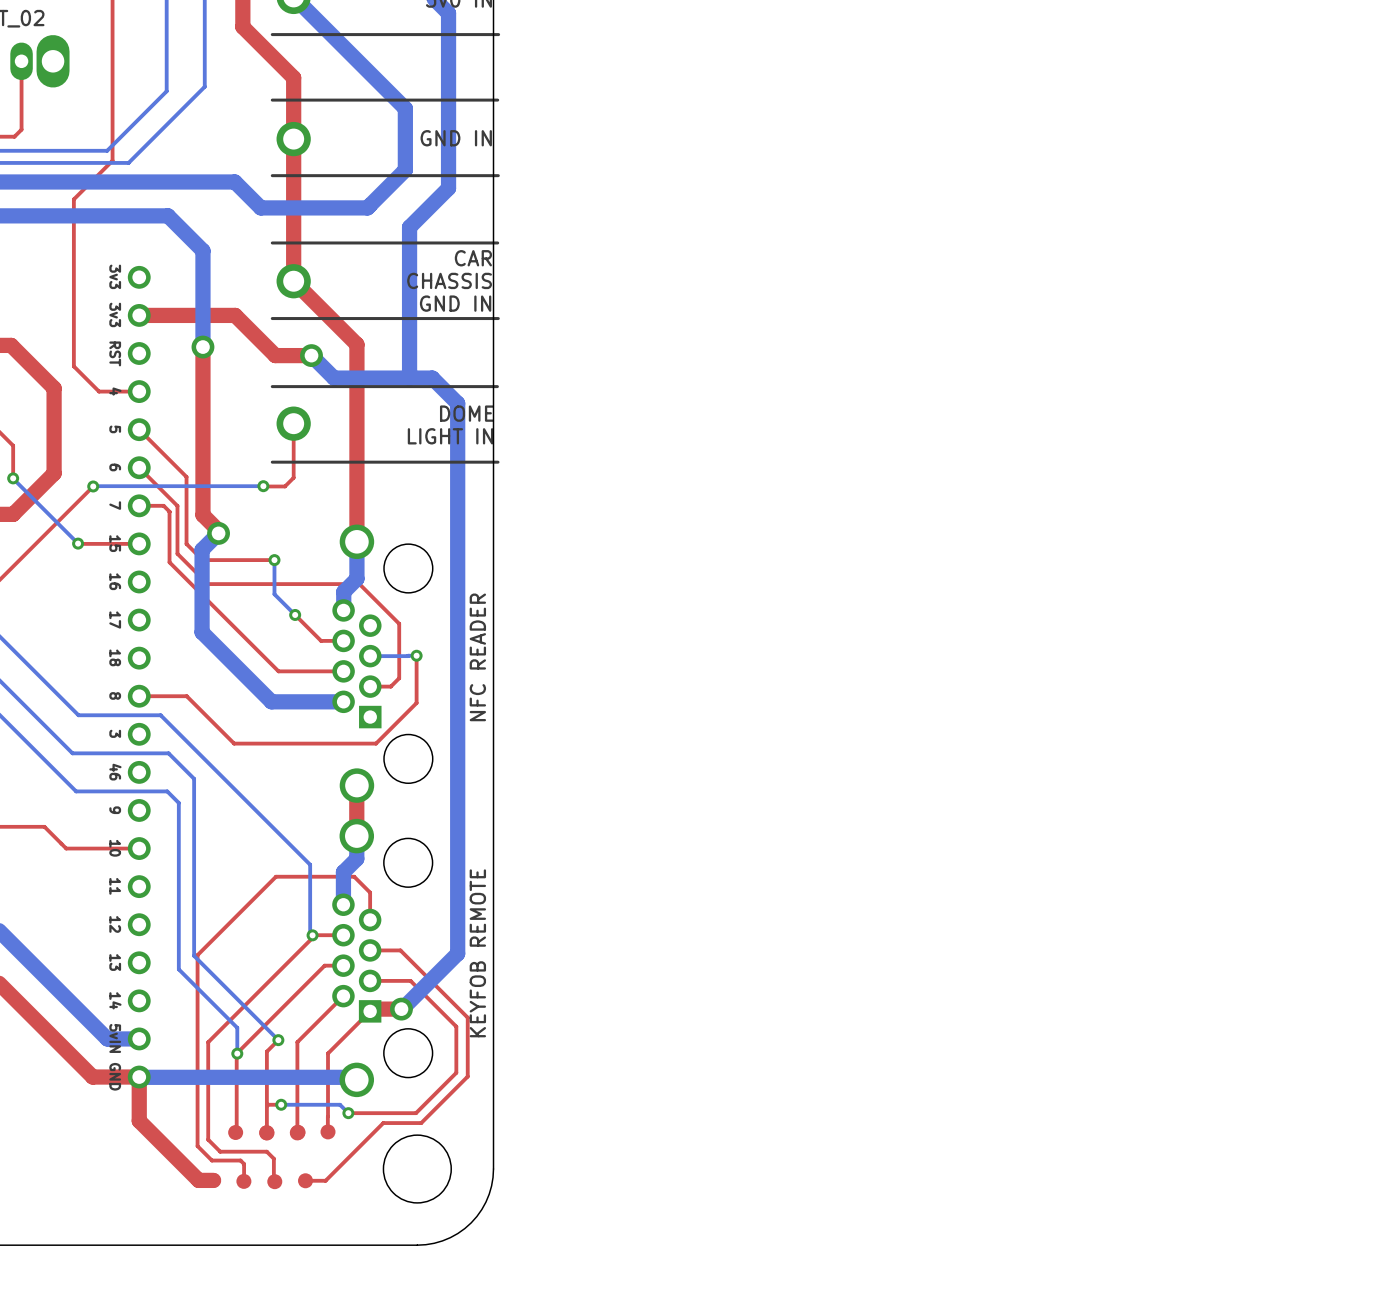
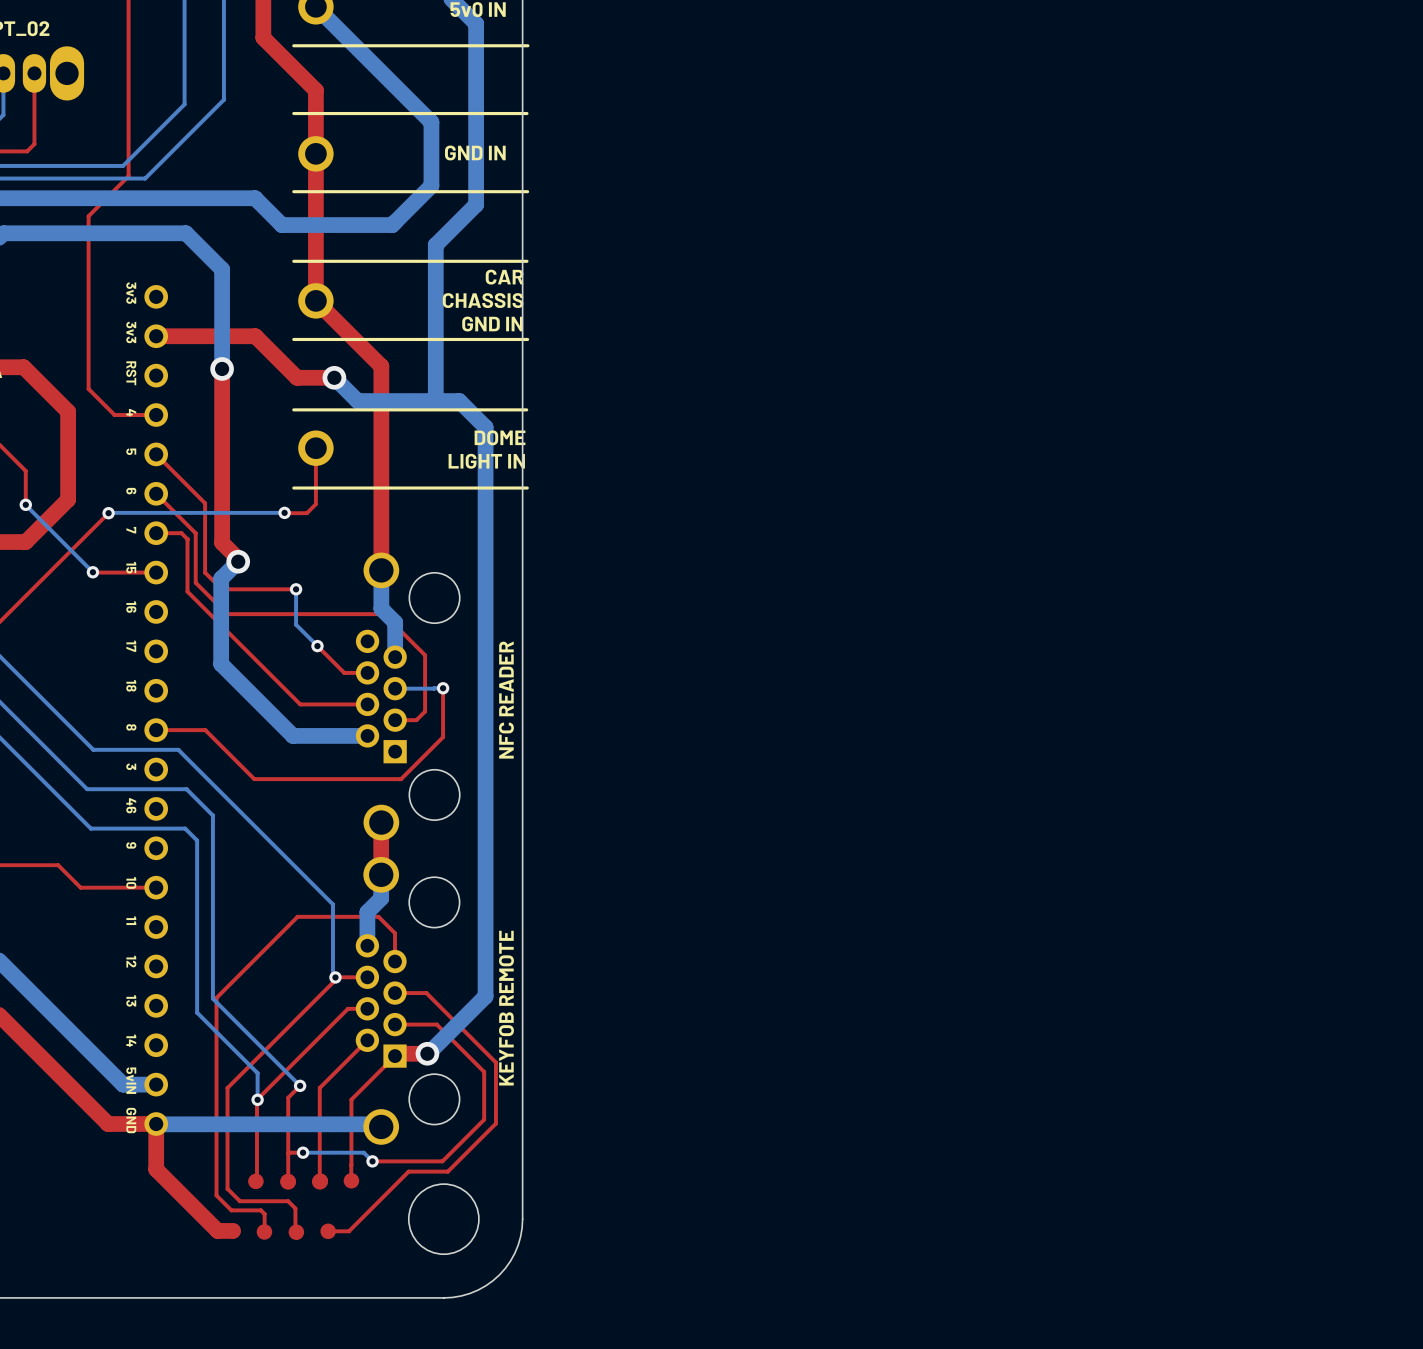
bottom track: (356, 578) (343, 592) (343, 609) -> (381, 608) (395, 622) (395, 657)

